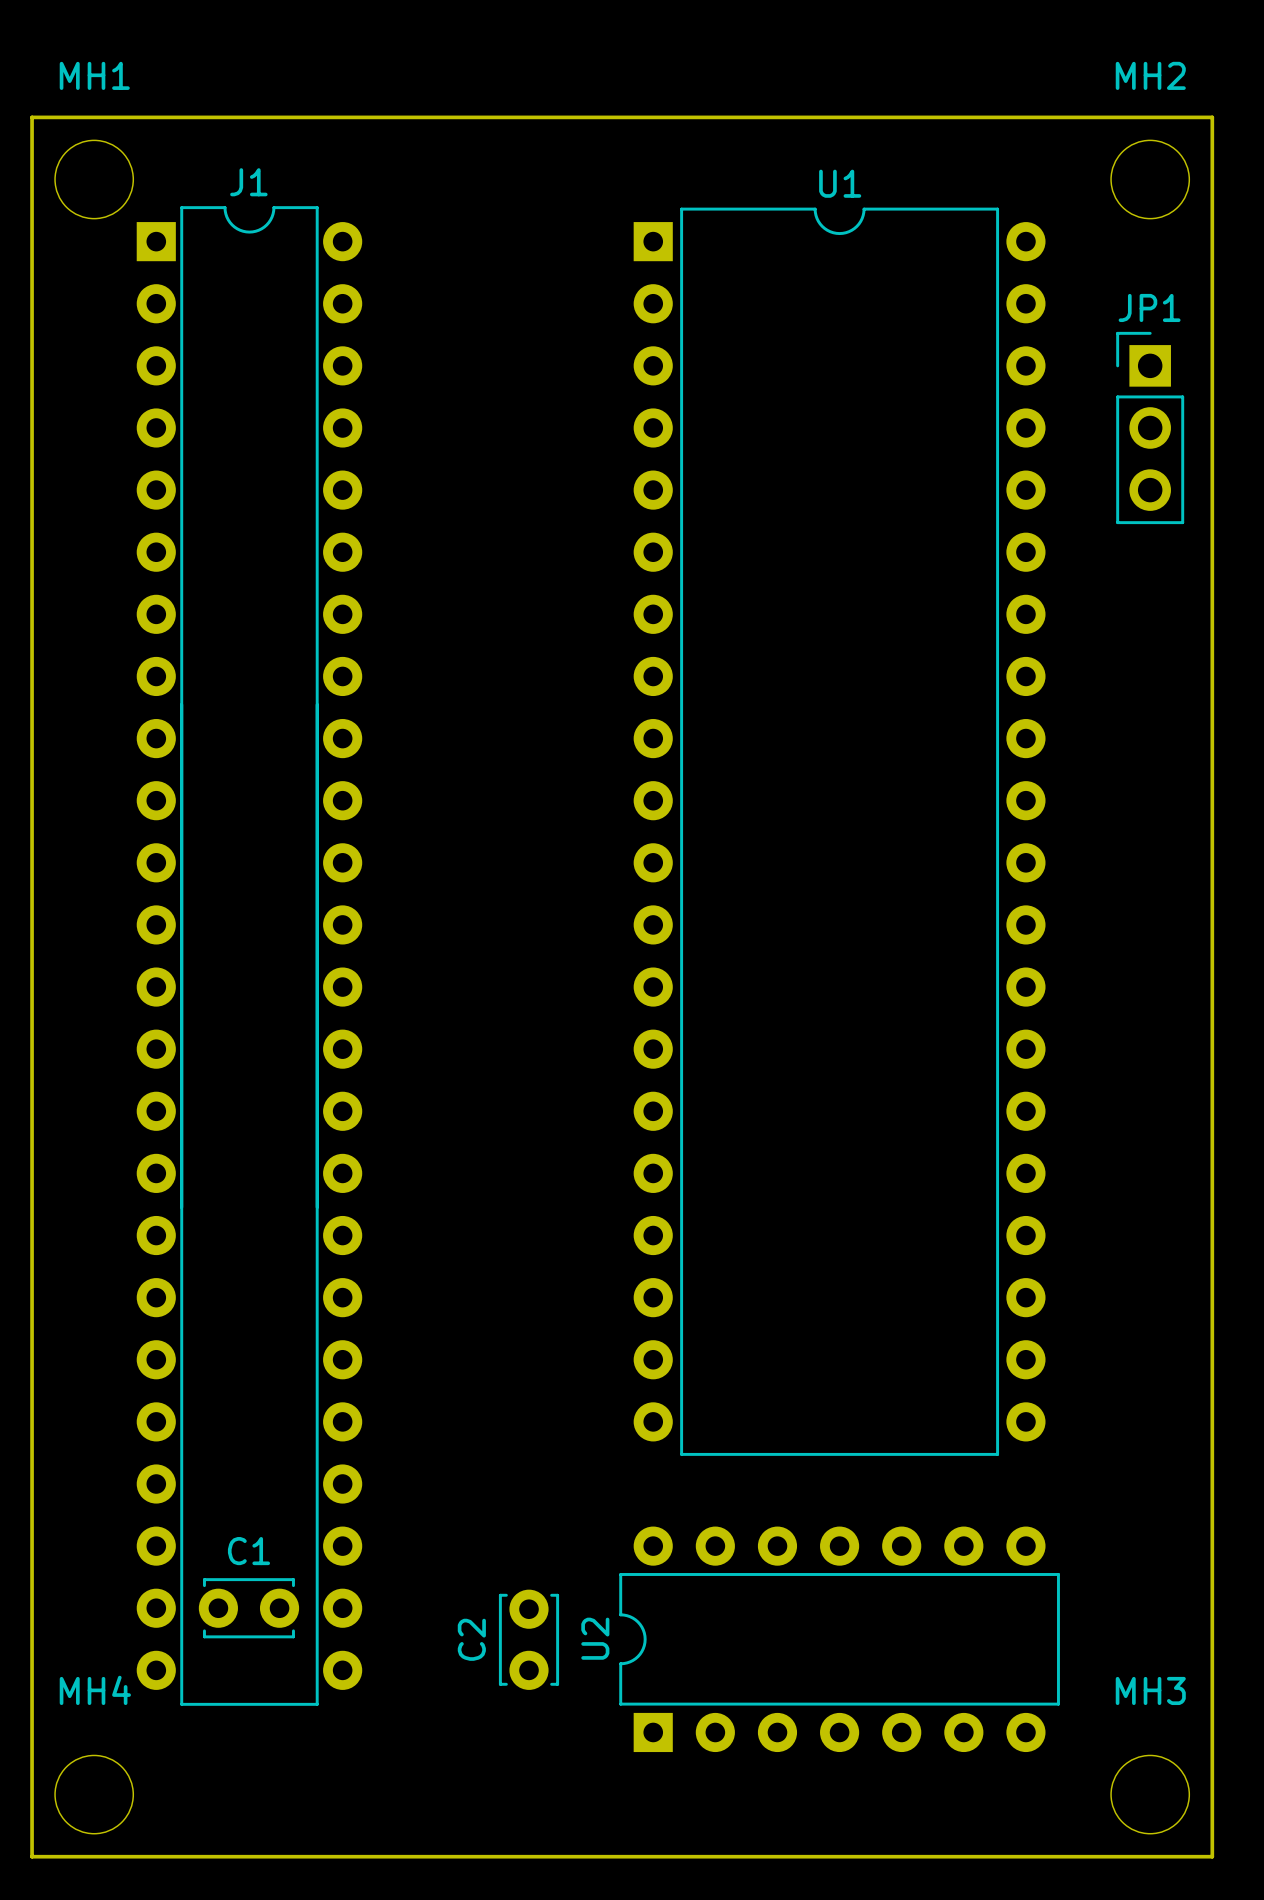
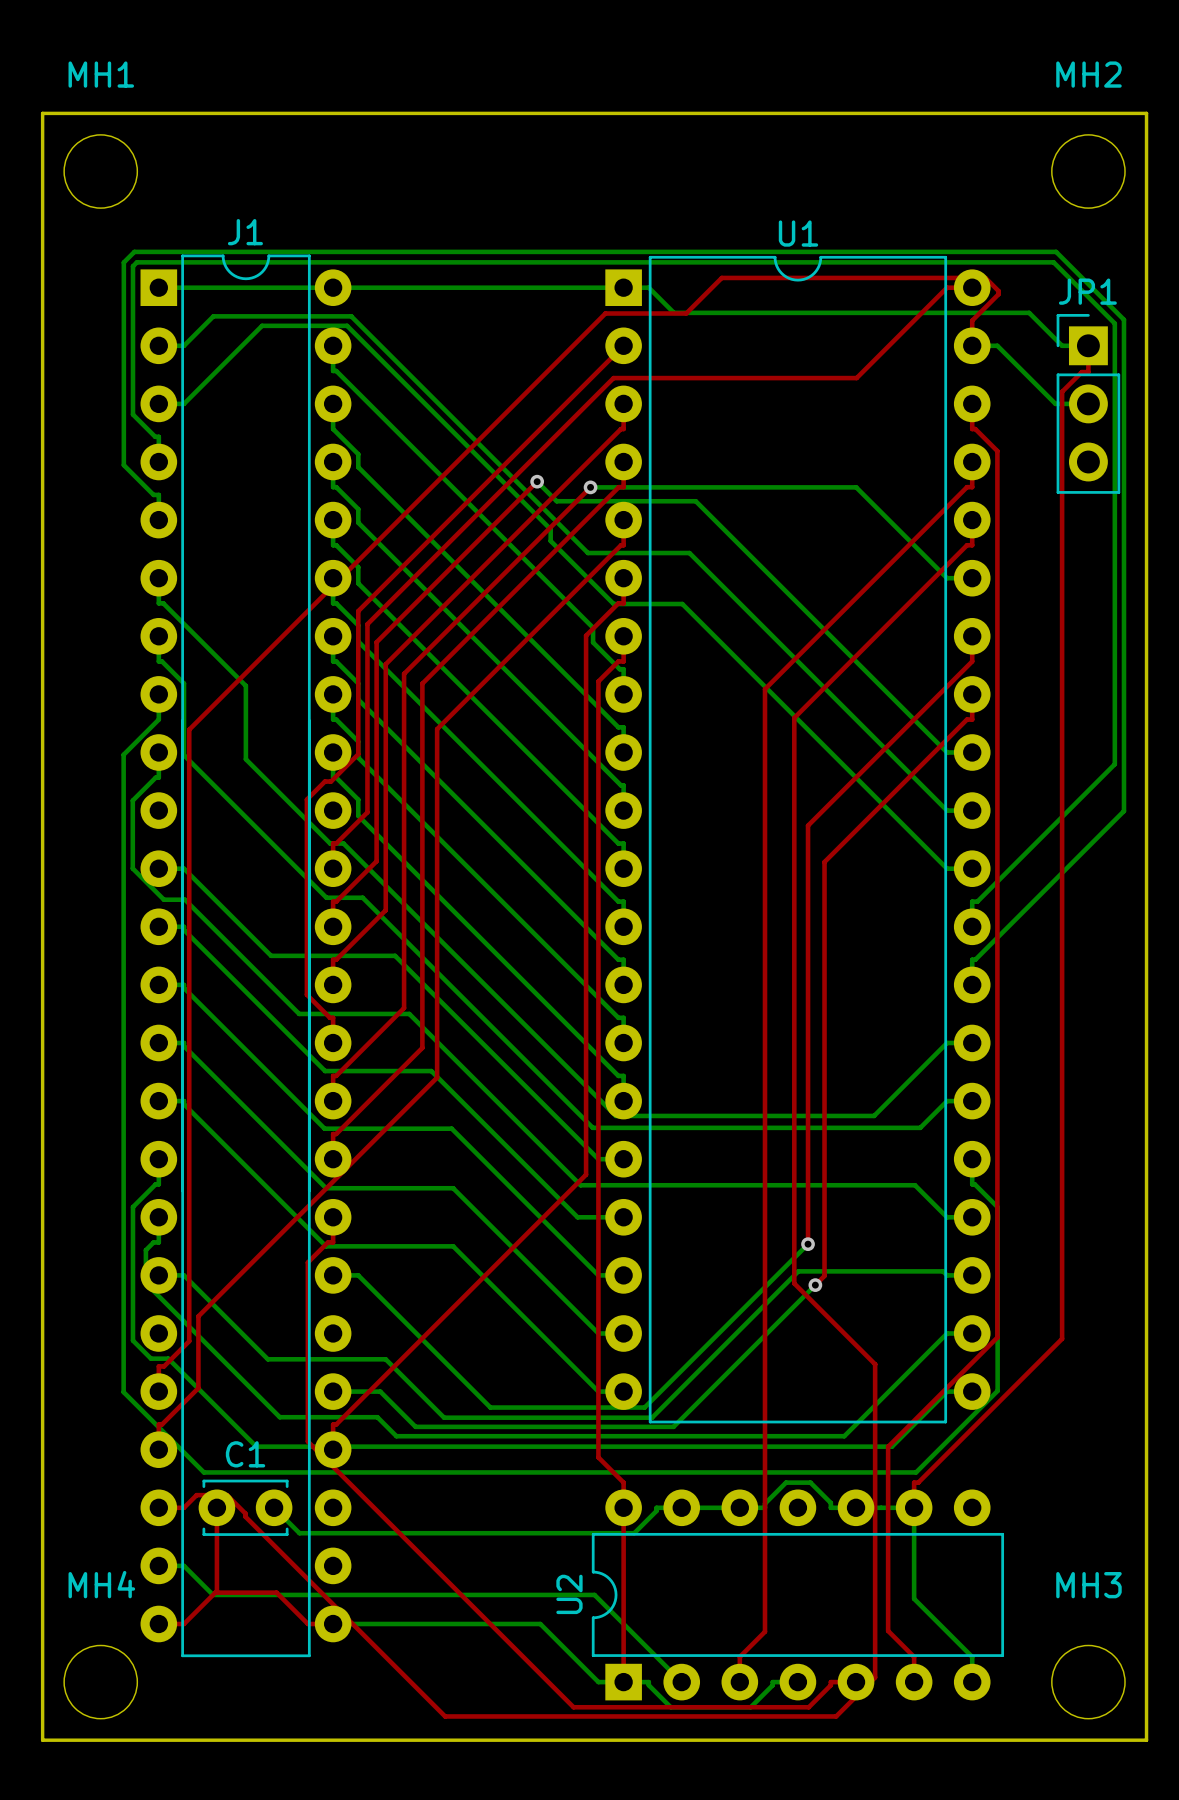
bottom track: none -> (158, 287) (648, 287) (673, 312) (1029, 312) (1062, 345) (1088, 345)
top track: none -> (972, 287) (947, 287) (856, 378) (613, 378) (367, 624) (367, 812) (336, 843) (333, 843) (333, 868)
bottom track: none -> (158, 345) (183, 345) (213, 316) (351, 316) (587, 553) (689, 553) (947, 810) (972, 810)
bottom track: none -> (333, 345) (333, 370) (336, 370) (593, 627) (593, 642) (619, 669) (623, 669) (623, 694)
top track: none -> (623, 345) (358, 611) (358, 754) (331, 781) (324, 781) (306, 799) (306, 994) (329, 1017) (333, 1017) (333, 1042)
top track: none -> (972, 345) (972, 320) (998, 294) (998, 291) (985, 277) (721, 277) (686, 313) (605, 313) (189, 729) (189, 1341) (164, 1366) (158, 1366) (158, 1391)
bottom track: none -> (972, 345) (997, 345) (1055, 403) (1088, 403)
top track: none -> (1088, 345) (1088, 372) (1081, 372) (1062, 391) (1062, 1338) (918, 1482) (914, 1482) (914, 1507)
bottom track: none -> (158, 403) (183, 403) (262, 325) (347, 325) (550, 529) (550, 540) (613, 604) (682, 604) (947, 868) (972, 868)
bottom track: none -> (333, 403) (333, 429) (358, 454) (358, 467) (618, 727) (623, 727) (623, 752)
top track: none -> (623, 403) (623, 429) (620, 429) (385, 664) (385, 910) (336, 959) (333, 959) (333, 984)
top track: none -> (972, 403) (972, 429) (975, 429) (997, 451) (997, 1337) (888, 1446) (888, 1630) (914, 1656) (914, 1682)
bottom track: none -> (158, 461) (158, 436) (155, 436) (132, 414) (132, 266) (136, 262) (1053, 262) (1114, 323) (1114, 764) (977, 901) (972, 901) (972, 926)
bottom track: none -> (333, 461) (333, 487) (336, 487) (358, 509) (358, 522) (621, 785) (623, 785) (623, 810)
top track: none -> (623, 461) (623, 487) (618, 487) (422, 683) (422, 1047) (336, 1134) (333, 1134) (333, 1159)
top track: none -> (972, 461) (972, 487) (967, 487) (764, 689) (764, 1631) (739, 1656) (739, 1682)
top track: none -> (537, 481) (376, 642) (376, 861) (336, 901) (333, 901) (333, 926)
bottom track: none -> (537, 481) (556, 501) (695, 501) (947, 752) (972, 752)
via: none -> (537, 481)
top track: none -> (590, 487) (404, 673) (404, 1008) (336, 1075) (333, 1075) (333, 1101)
bottom track: none -> (590, 487) (856, 487) (947, 578) (972, 578)
via: none -> (590, 487)
bottom track: none -> (158, 520) (158, 494) (153, 494) (123, 465) (123, 262) (134, 251) (1056, 251) (1123, 319) (1123, 811) (975, 959) (972, 959) (972, 984)
bottom track: none -> (333, 520) (333, 545) (336, 545) (358, 567) (358, 583) (618, 843) (623, 843) (623, 868)
top track: none -> (623, 520) (623, 545) (621, 545) (437, 729) (437, 1077) (198, 1316) (198, 1388) (161, 1424) (158, 1424) (158, 1449)
top track: none -> (972, 520) (972, 545) (967, 545) (794, 717) (794, 1283) (875, 1364) (875, 1677) (836, 1716) (445, 1716) (245, 1516) (245, 1513) (227, 1495) (196, 1495) (183, 1507) (158, 1507)
bottom track: none -> (158, 578) (158, 603) (163, 603) (245, 685) (245, 759) (330, 843) (343, 843) (615, 1115) (874, 1115) (947, 1042) (972, 1042)
bottom track: none -> (333, 578) (333, 603) (336, 603) (358, 625) (358, 641) (618, 901) (623, 901) (623, 926)
top track: none -> (623, 578) (623, 603) (618, 603) (586, 635) (586, 1174) (336, 1424) (333, 1424) (333, 1449)
bottom track: none -> (158, 636) (158, 661) (161, 661) (183, 683) (183, 755) (326, 897) (362, 897) (592, 1127) (920, 1127) (947, 1101) (972, 1101)
bottom track: none -> (333, 636) (333, 661) (336, 661) (358, 683) (358, 699) (618, 959) (623, 959) (623, 984)
top track: none -> (623, 636) (623, 661) (618, 661) (598, 681) (598, 1457) (623, 1482) (623, 1682)
top track: none -> (972, 636) (972, 661) (808, 825) (808, 1244)
bottom track: none -> (158, 694) (158, 719) (123, 754) (123, 1392) (203, 1472) (916, 1472) (997, 1390) (997, 1207) (974, 1184) (972, 1184) (972, 1159)
bottom track: none -> (333, 694) (333, 719) (336, 719) (358, 741) (358, 757) (618, 1017) (623, 1017) (623, 1042)
top track: none -> (972, 694) (972, 719) (967, 719) (824, 862) (824, 1275) (815, 1285)
bottom track: none -> (158, 752) (158, 777) (155, 777) (132, 800) (132, 868) (163, 899) (184, 899) (299, 1013) (409, 1013) (580, 1185) (915, 1185) (947, 1217) (972, 1217)
bottom track: none -> (333, 752) (333, 777) (336, 777) (358, 799) (358, 815) (618, 1075) (623, 1075) (623, 1101)
U1 position: (839, 831) -> (797, 839)
bottom track: none -> (158, 868) (183, 868) (271, 955) (395, 955) (598, 1159) (623, 1159)
J1 position: (249, 955) -> (245, 955)
bottom track: none -> (158, 926) (183, 926) (183, 929) (325, 1071) (431, 1071) (577, 1217) (623, 1217)
bottom track: none -> (158, 984) (183, 984) (183, 988) (324, 1128) (451, 1128) (598, 1275) (623, 1275)
bottom track: none -> (158, 1042) (183, 1042) (183, 1046) (326, 1188) (453, 1188) (598, 1333) (623, 1333)
bottom track: none -> (158, 1101) (183, 1101) (183, 1104) (326, 1246) (453, 1246) (598, 1391) (623, 1391)
bottom track: none -> (158, 1159) (158, 1184) (155, 1184) (132, 1207) (132, 1340) (151, 1358) (168, 1358) (256, 1446) (892, 1446) (947, 1391) (972, 1391)
bottom track: none -> (158, 1217) (158, 1242) (153, 1242) (145, 1250) (145, 1283) (279, 1417) (377, 1417) (396, 1436) (844, 1436) (947, 1333) (972, 1333)
top track: none -> (333, 1217) (333, 1242) (327, 1242) (307, 1262) (307, 1441) (573, 1707) (808, 1707) (830, 1685) (830, 1682) (856, 1682)
bottom track: none -> (808, 1244) (644, 1407) (490, 1407) (358, 1275) (333, 1275)
via: none -> (808, 1244)
bottom track: none -> (158, 1275) (183, 1275) (267, 1359) (385, 1359) (444, 1417) (652, 1417) (798, 1271) (943, 1271) (947, 1275) (972, 1275)
bottom track: none -> (815, 1285) (673, 1426) (415, 1426) (380, 1391) (333, 1391)
via: none -> (815, 1285)
top track: none -> (216, 1507) (216, 1592)
bottom track: none -> (274, 1507) (299, 1533) (634, 1533) (656, 1510) (656, 1507) (764, 1507) (764, 1503) (786, 1482) (810, 1482) (830, 1502) (830, 1507) (914, 1507) (914, 1598) (972, 1656) (972, 1682)
C2: (529, 1639) -> none
U2 position: (839, 1639) -> (797, 1594)
bottom track: none -> (158, 1565) (183, 1565) (213, 1594) (594, 1594) (681, 1682)
top track: none -> (158, 1623) (183, 1623) (215, 1592) (276, 1592) (307, 1623) (333, 1623)
bottom track: none -> (333, 1623) (540, 1623) (598, 1682) (648, 1682) (648, 1685) (670, 1707) (750, 1707) (772, 1685) (772, 1682) (797, 1682)

